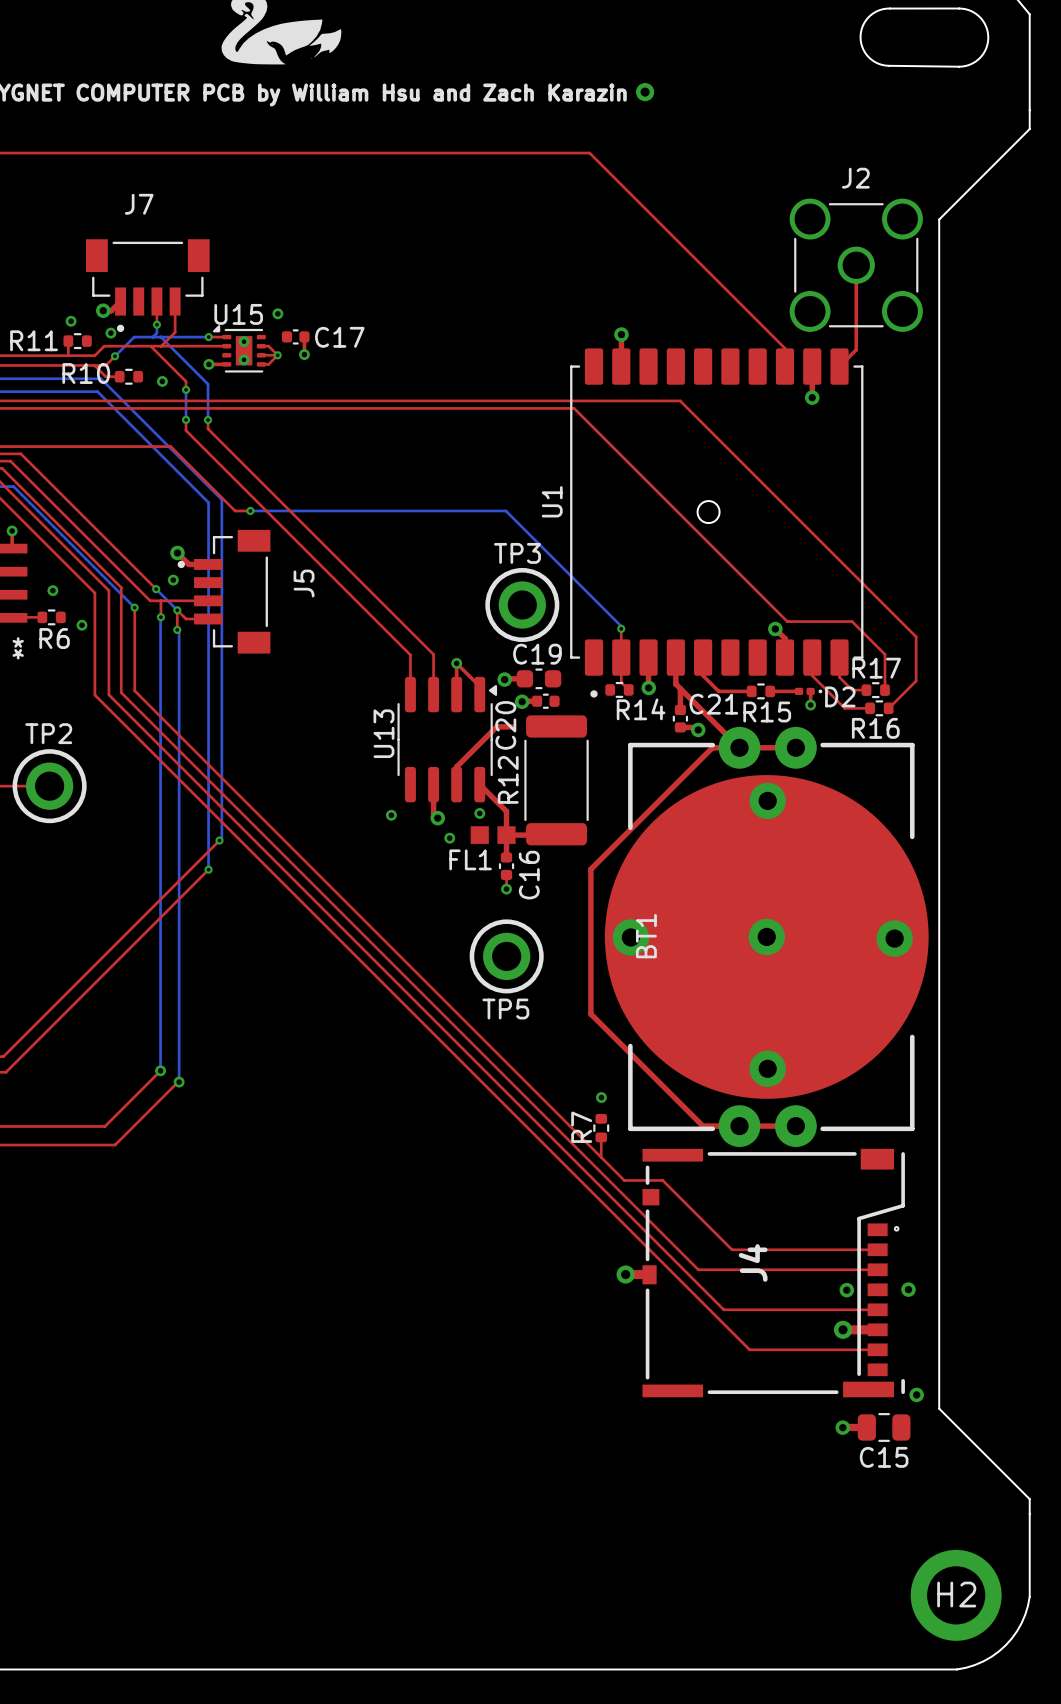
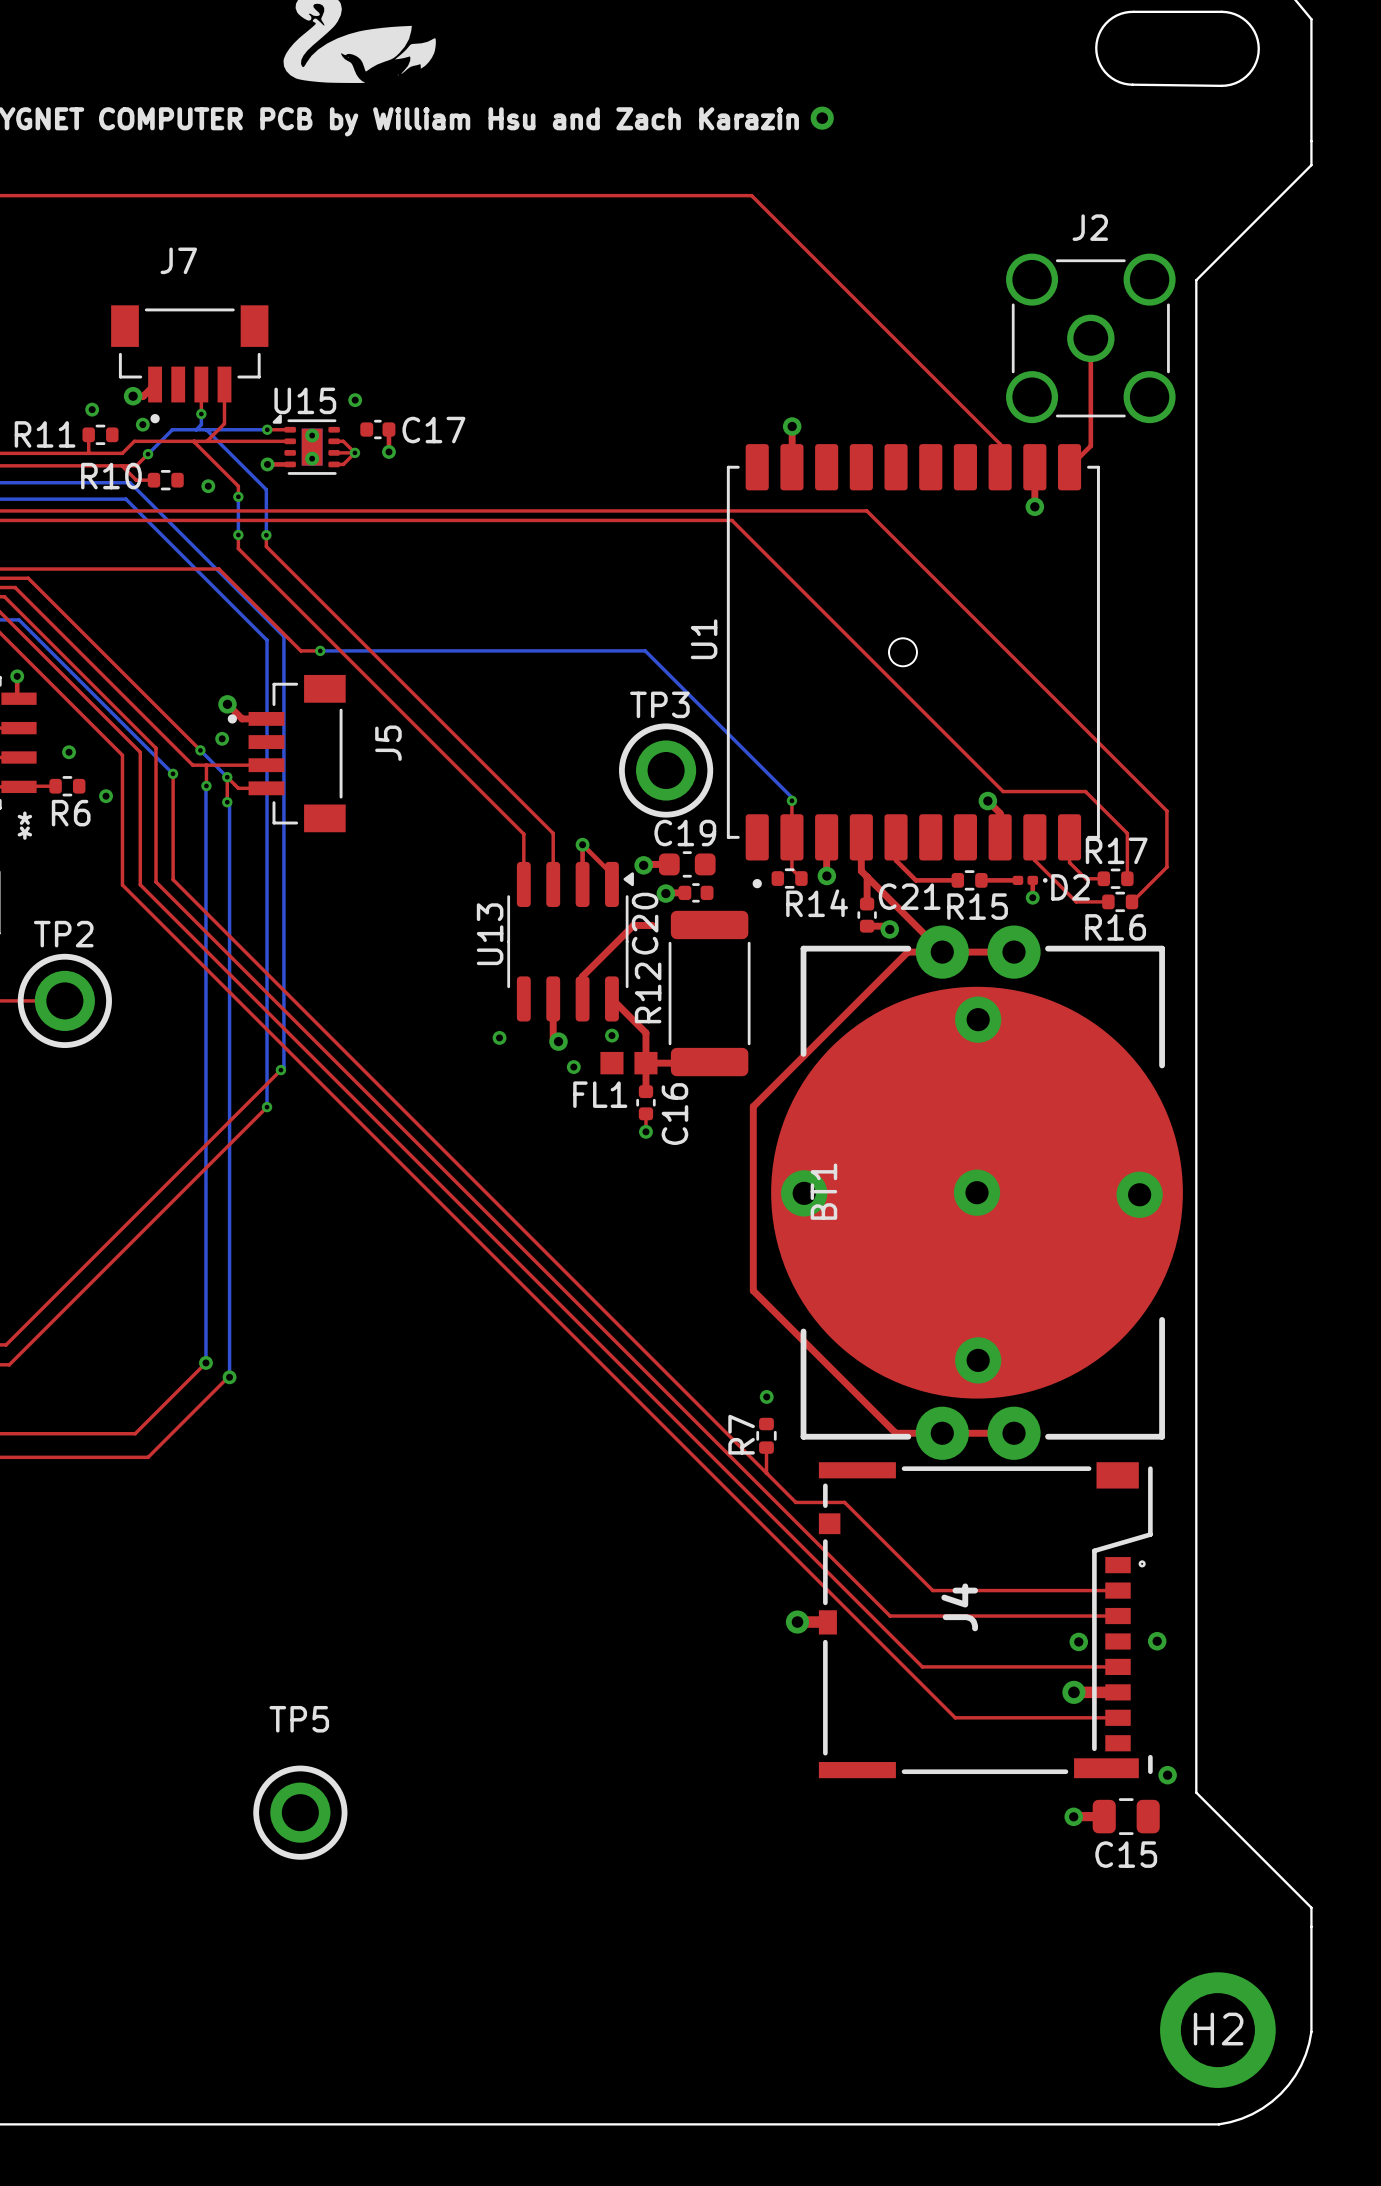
TP5 position: (506, 956) -> (300, 1812)
TP5 name position: TP5 (505, 1009) -> TP5 (299, 1719)

